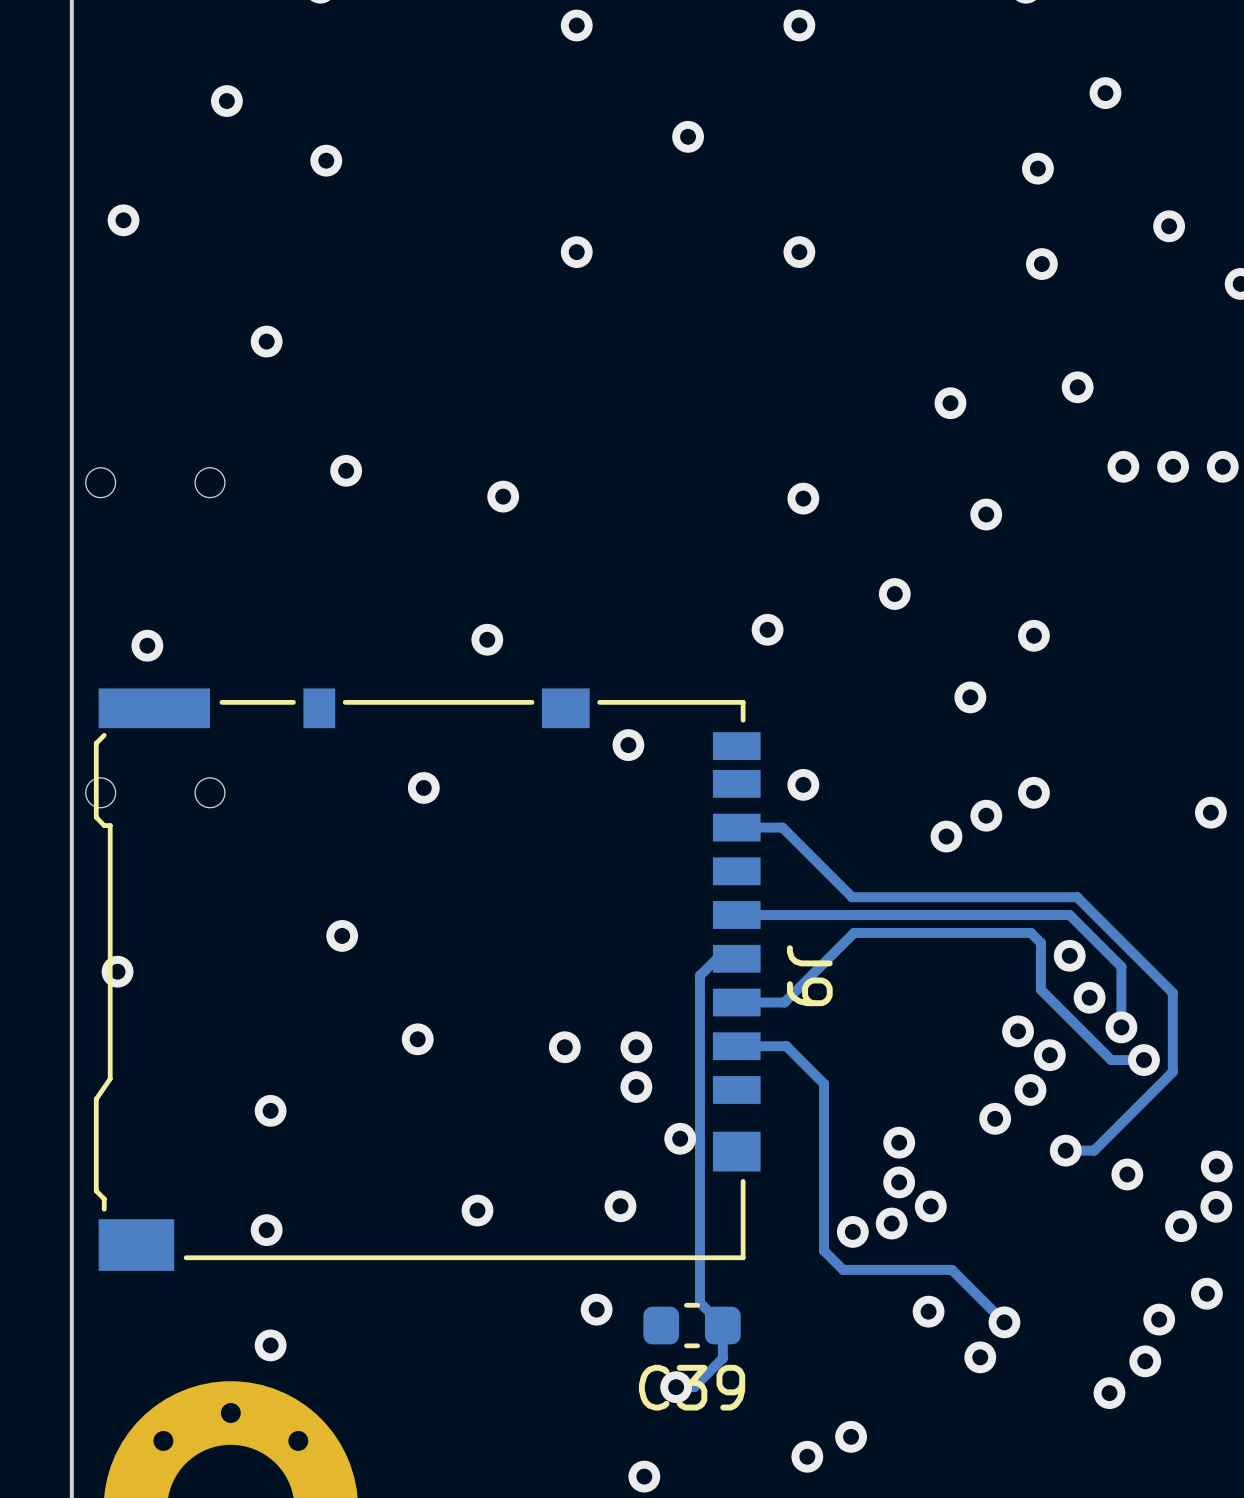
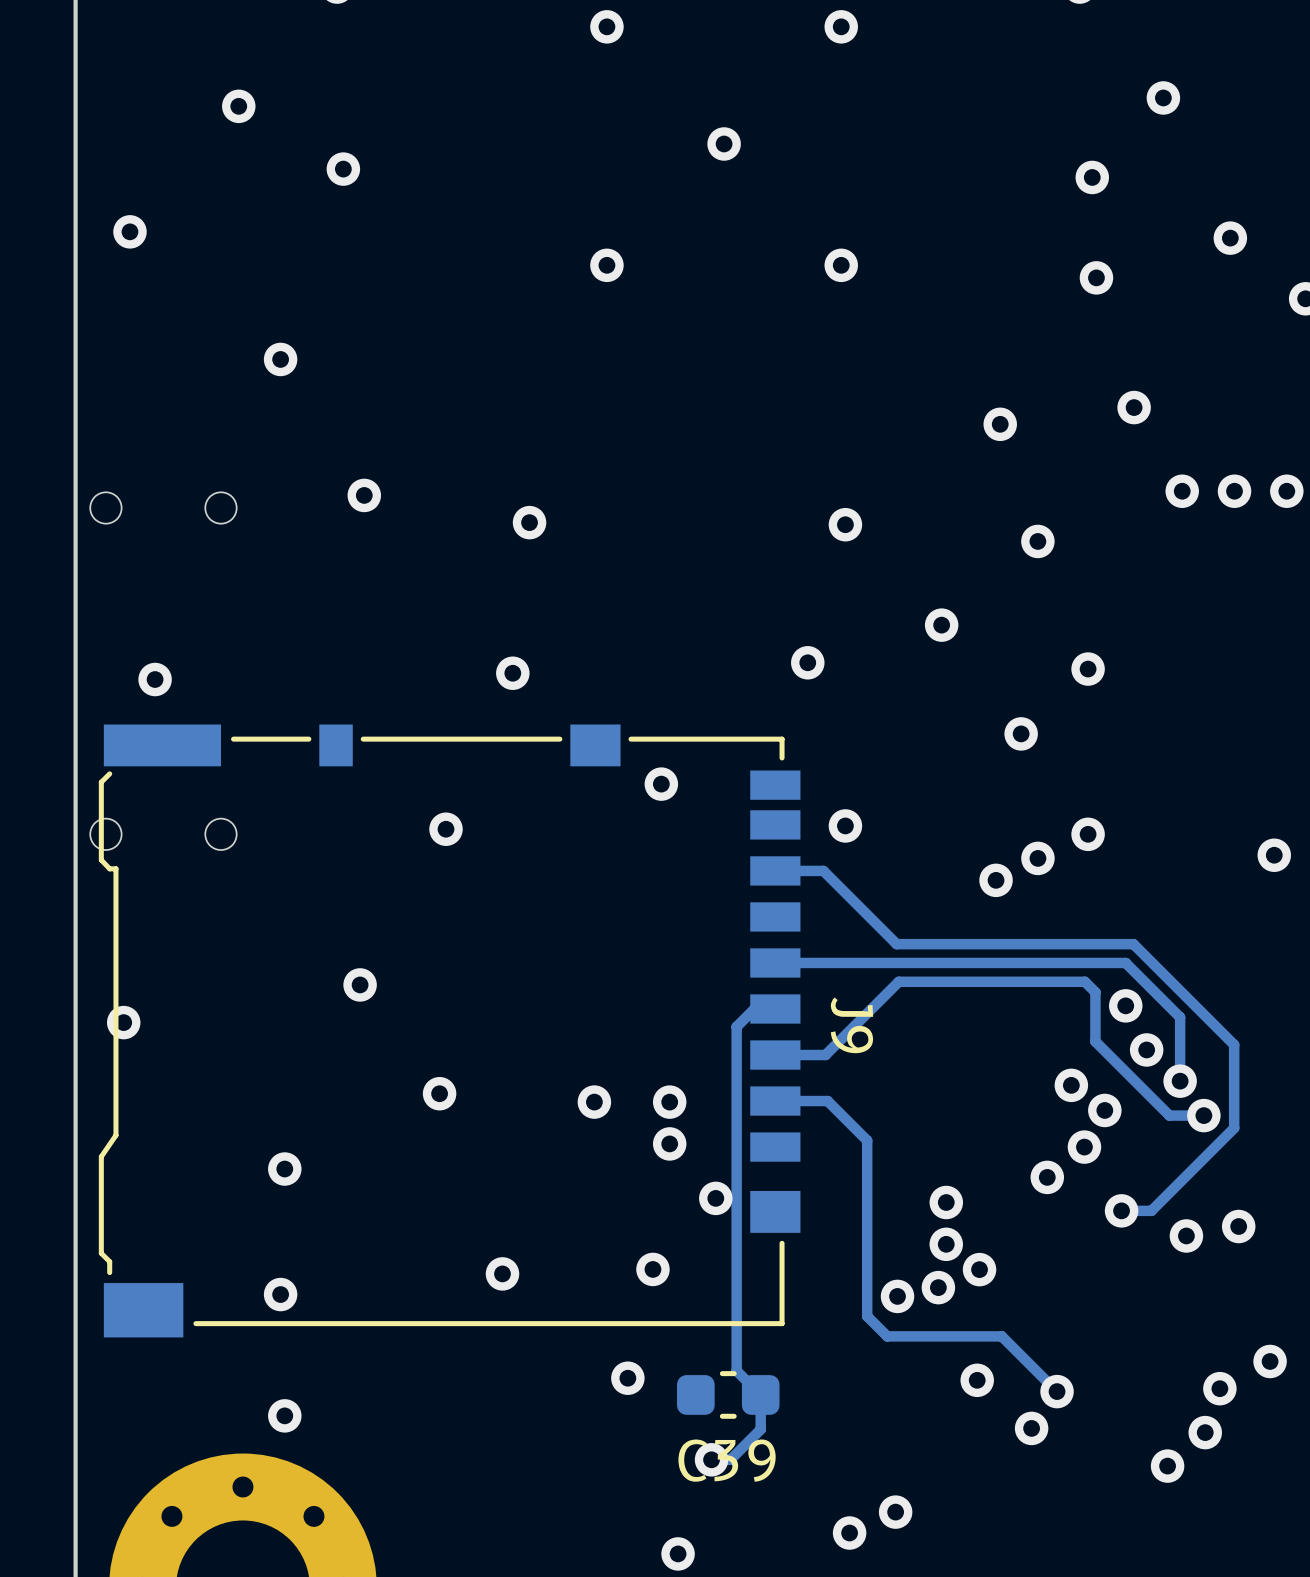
via: none -> (1238, 1226)
via: (1216, 1166) -> none
via: (1216, 1206) -> none
via: (1181, 1226) -> none

